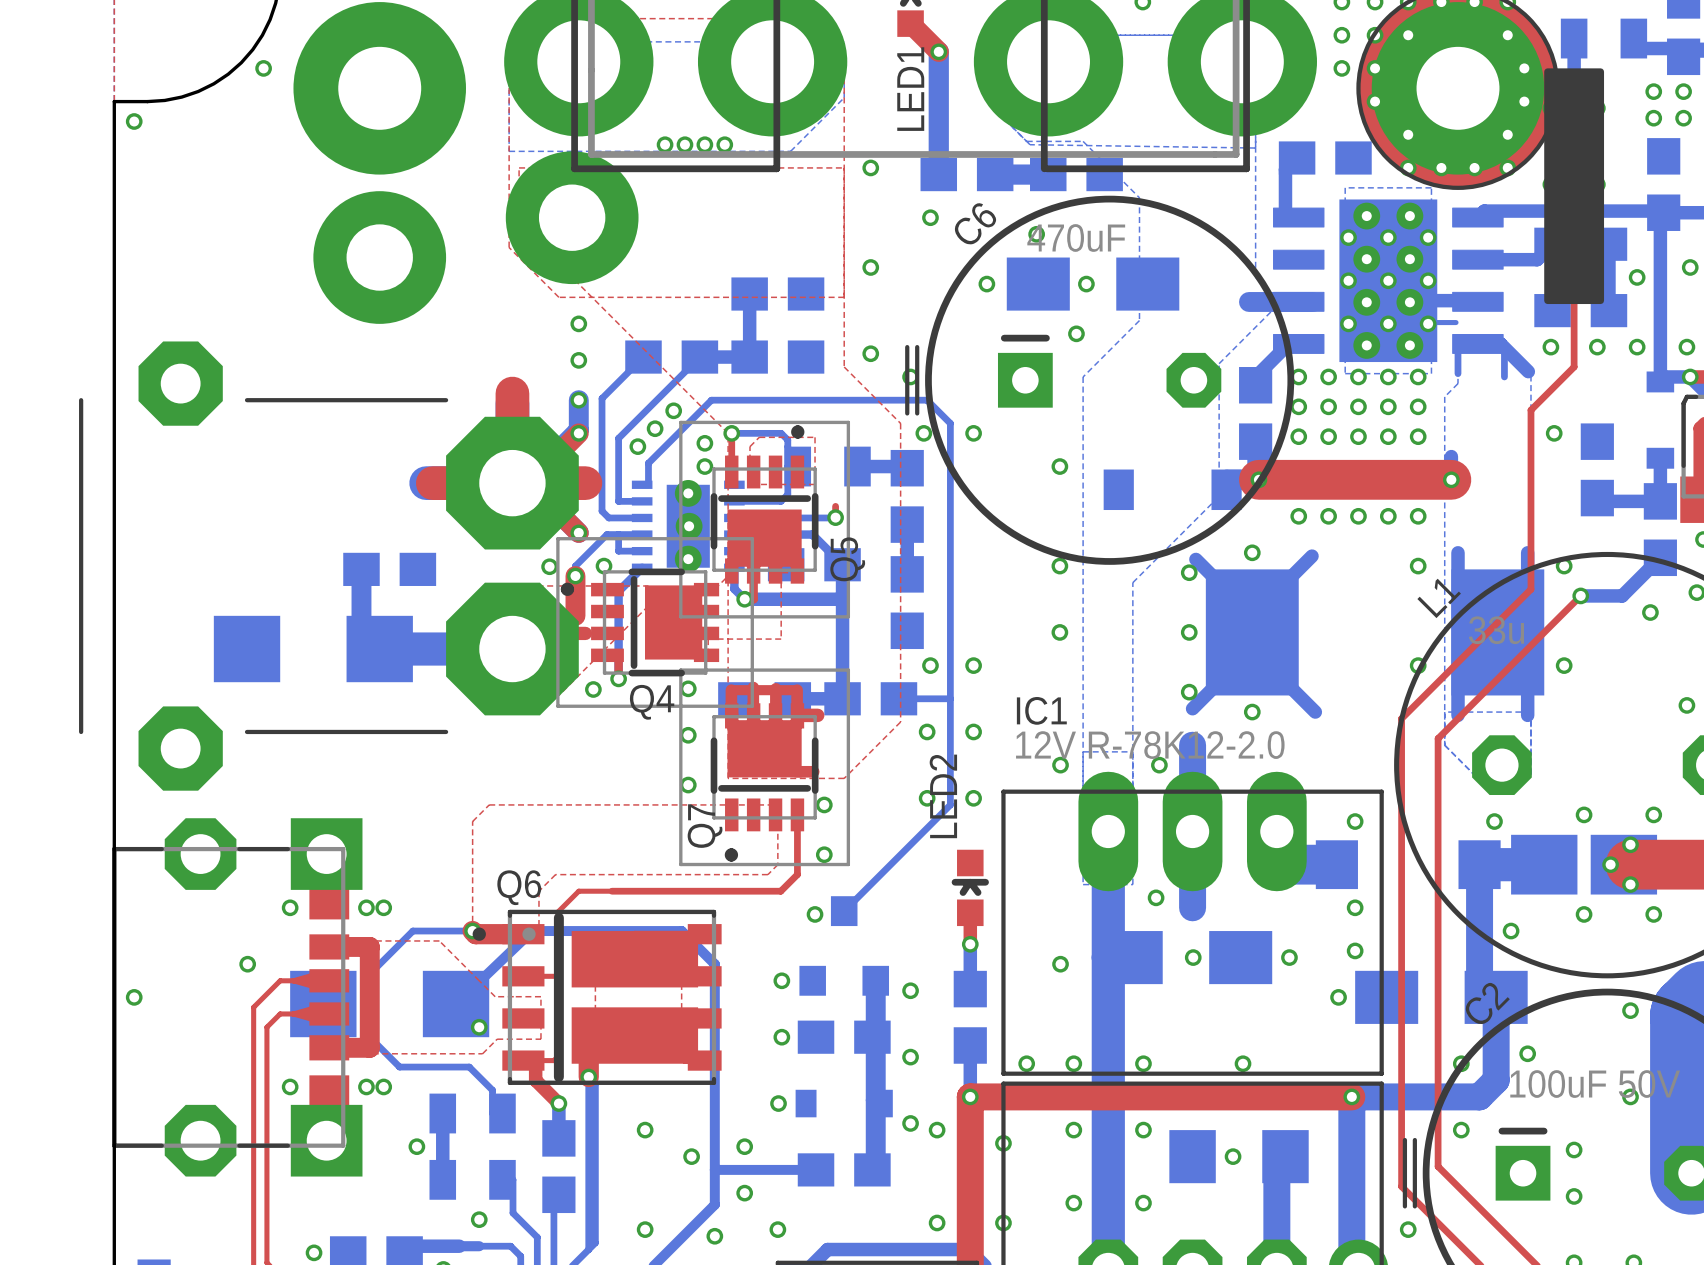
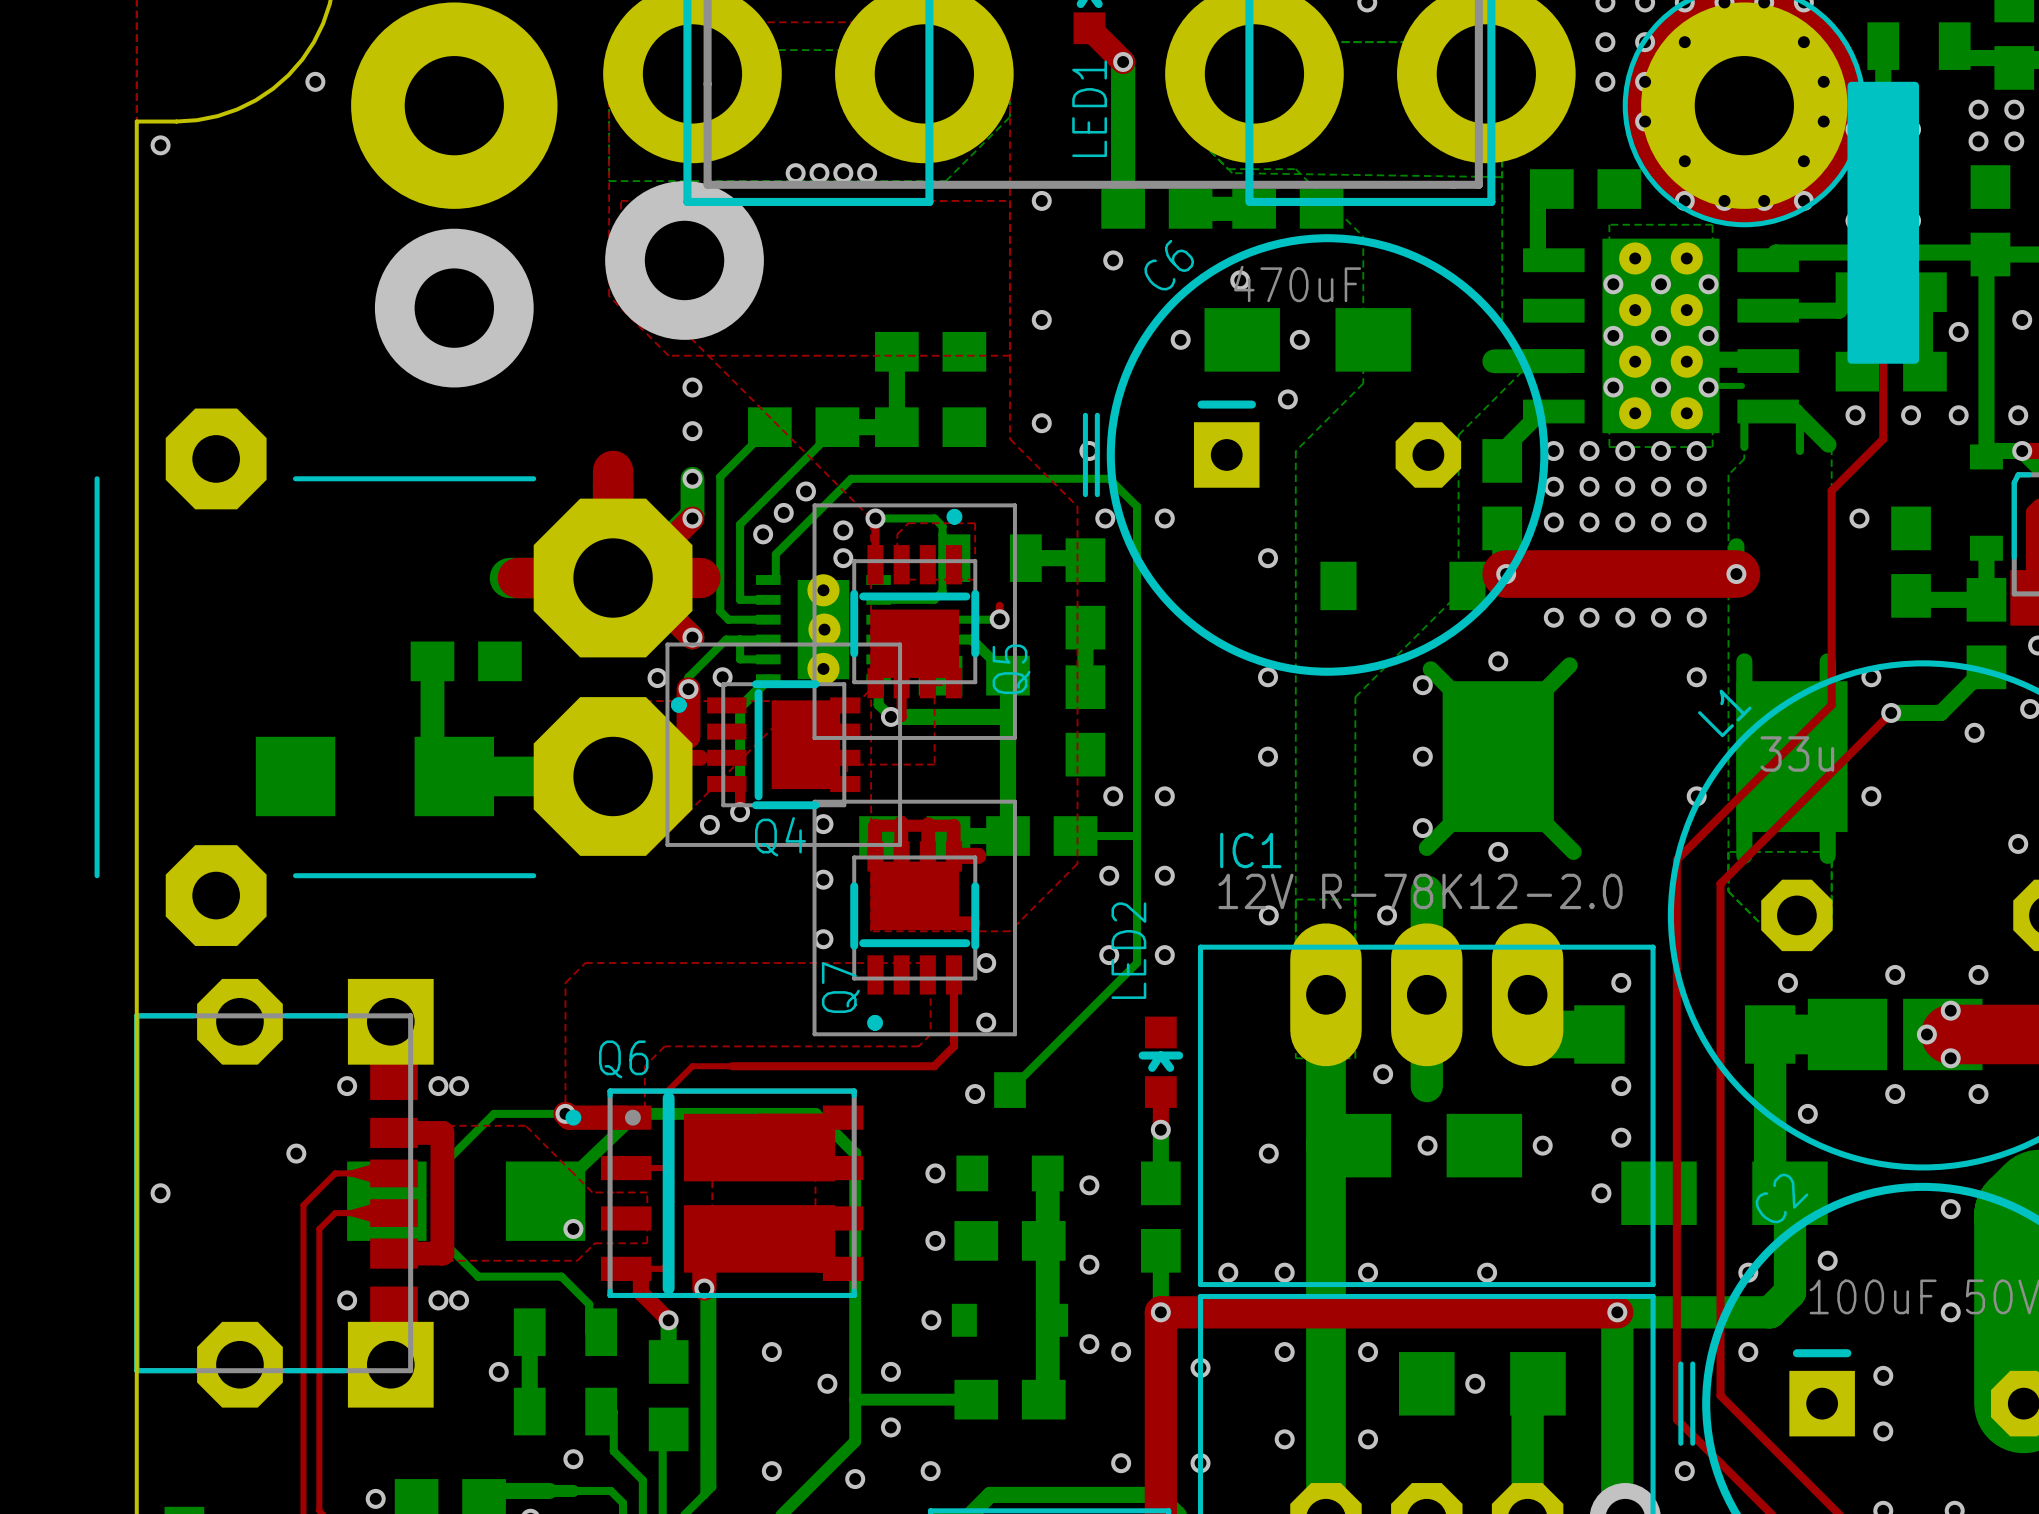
part position: (389, 569) -> (466, 661)

